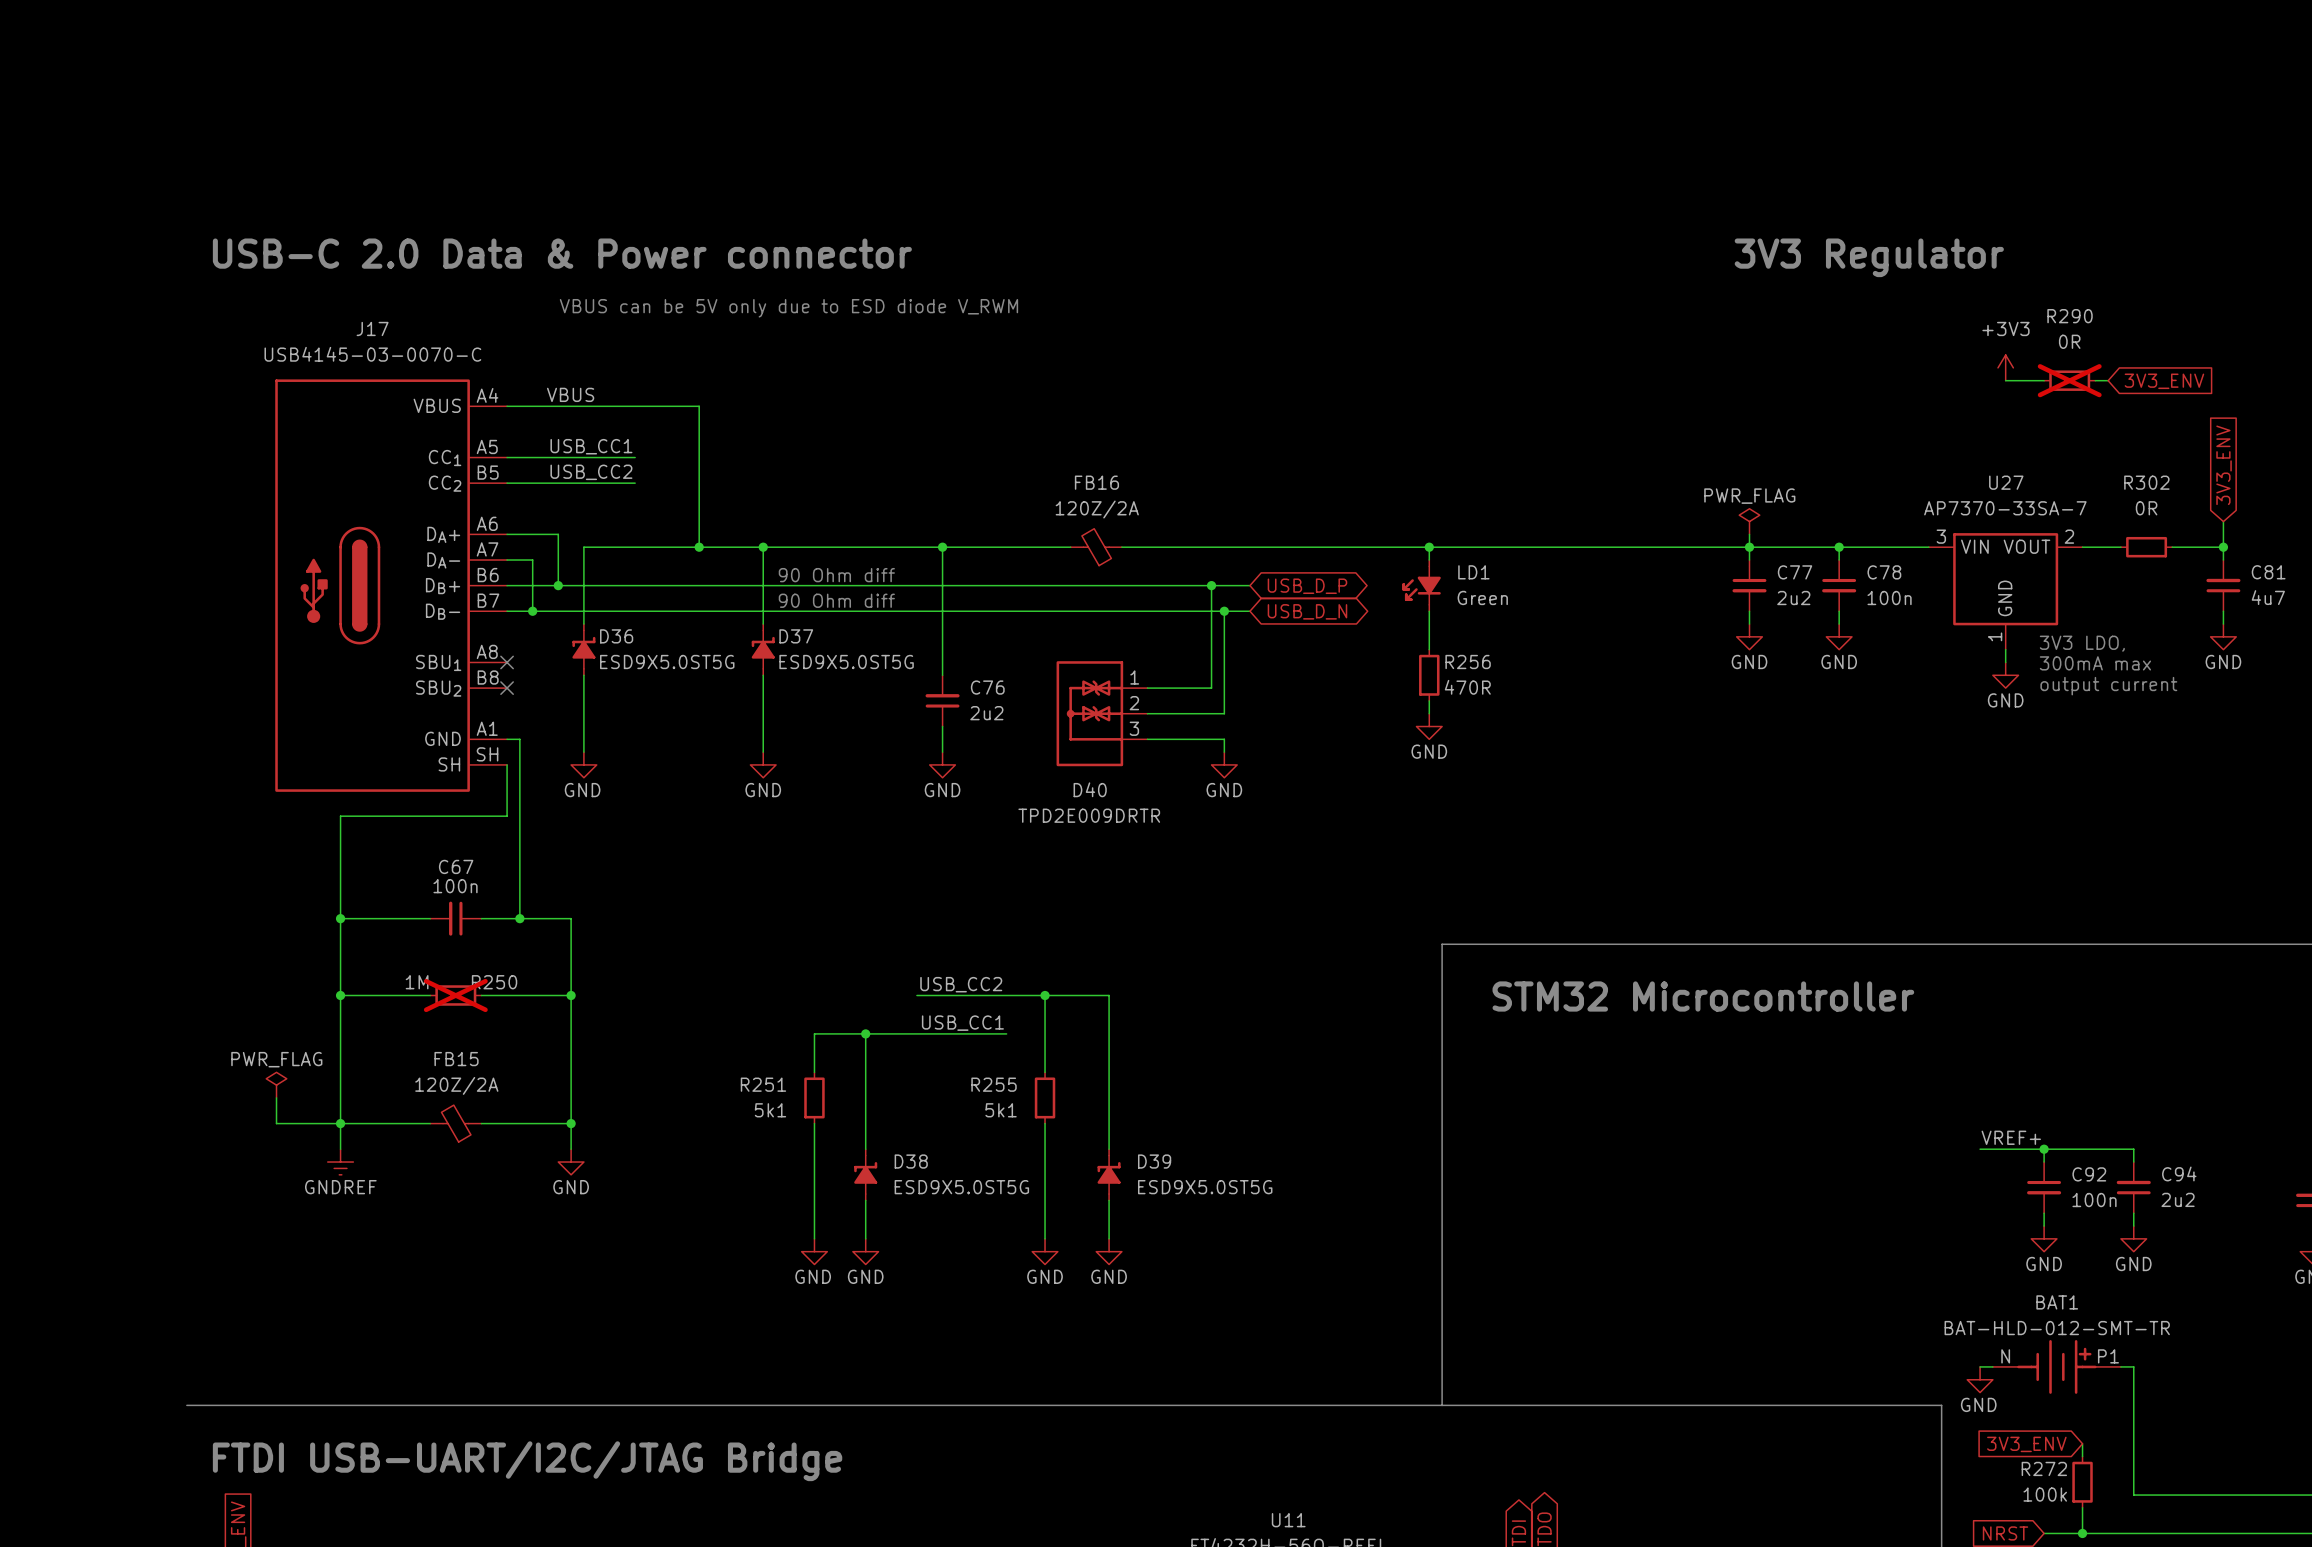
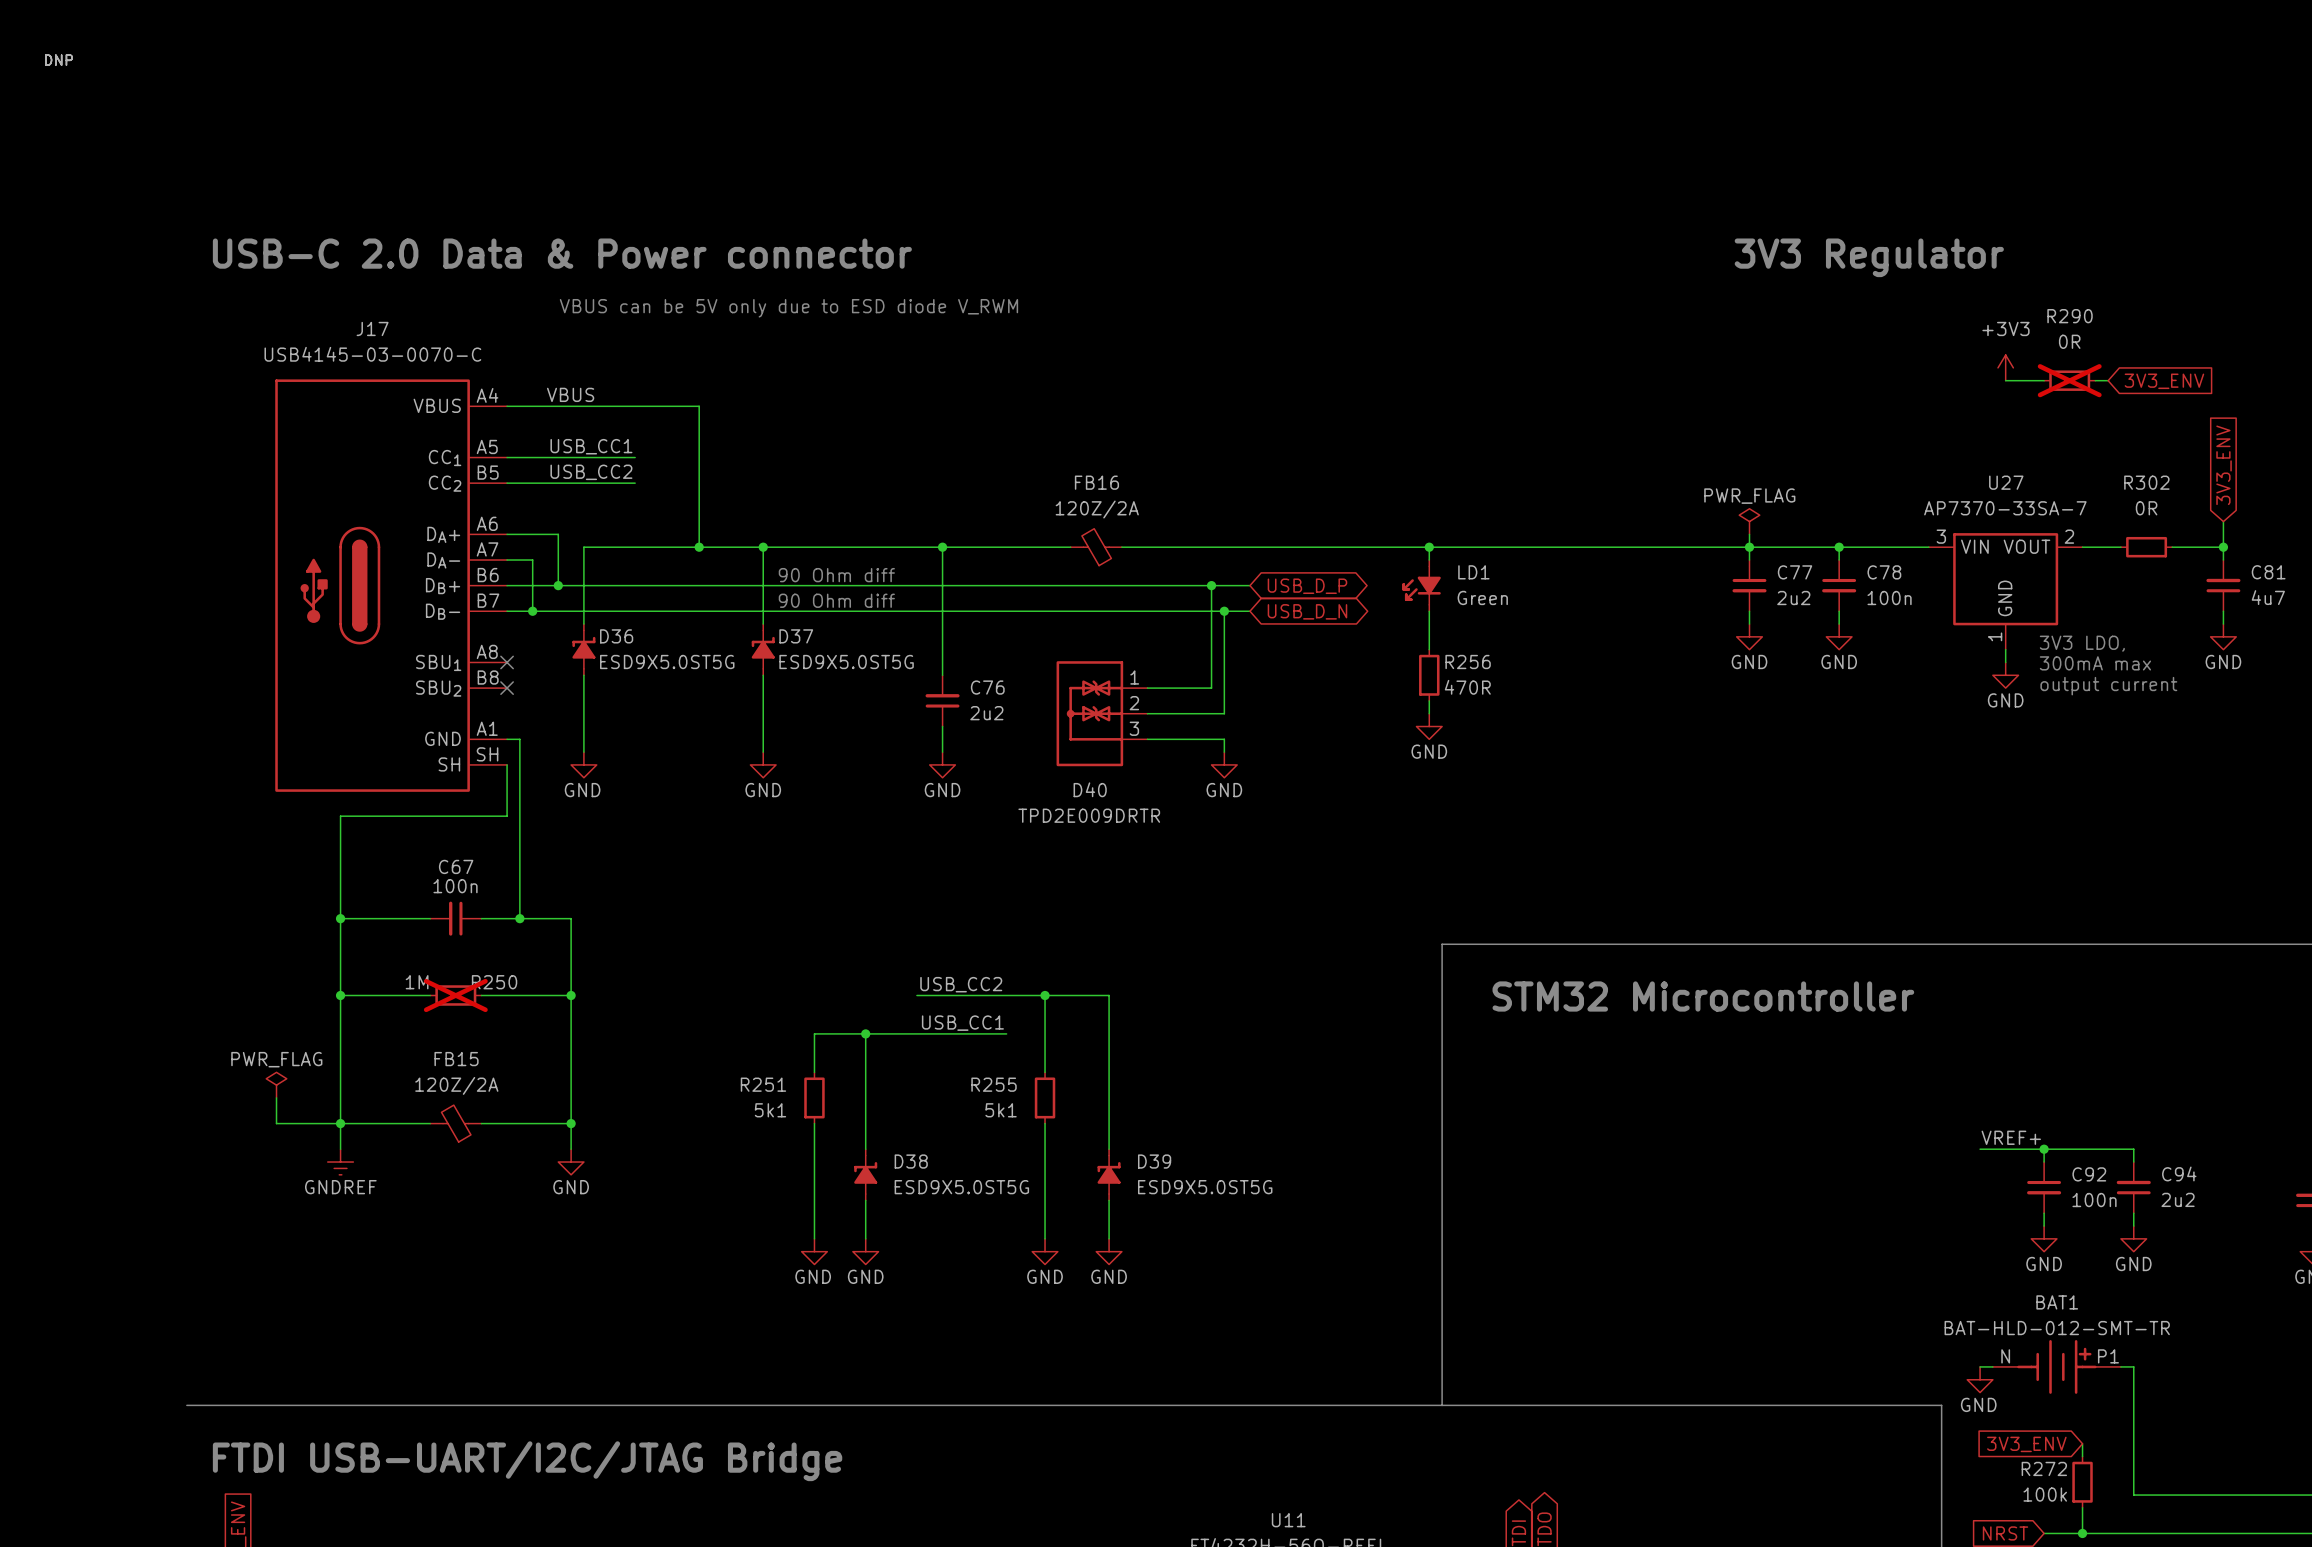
R290 text: none -> DNP (59, 60)
R250 text: none -> DNP (59, 60)

